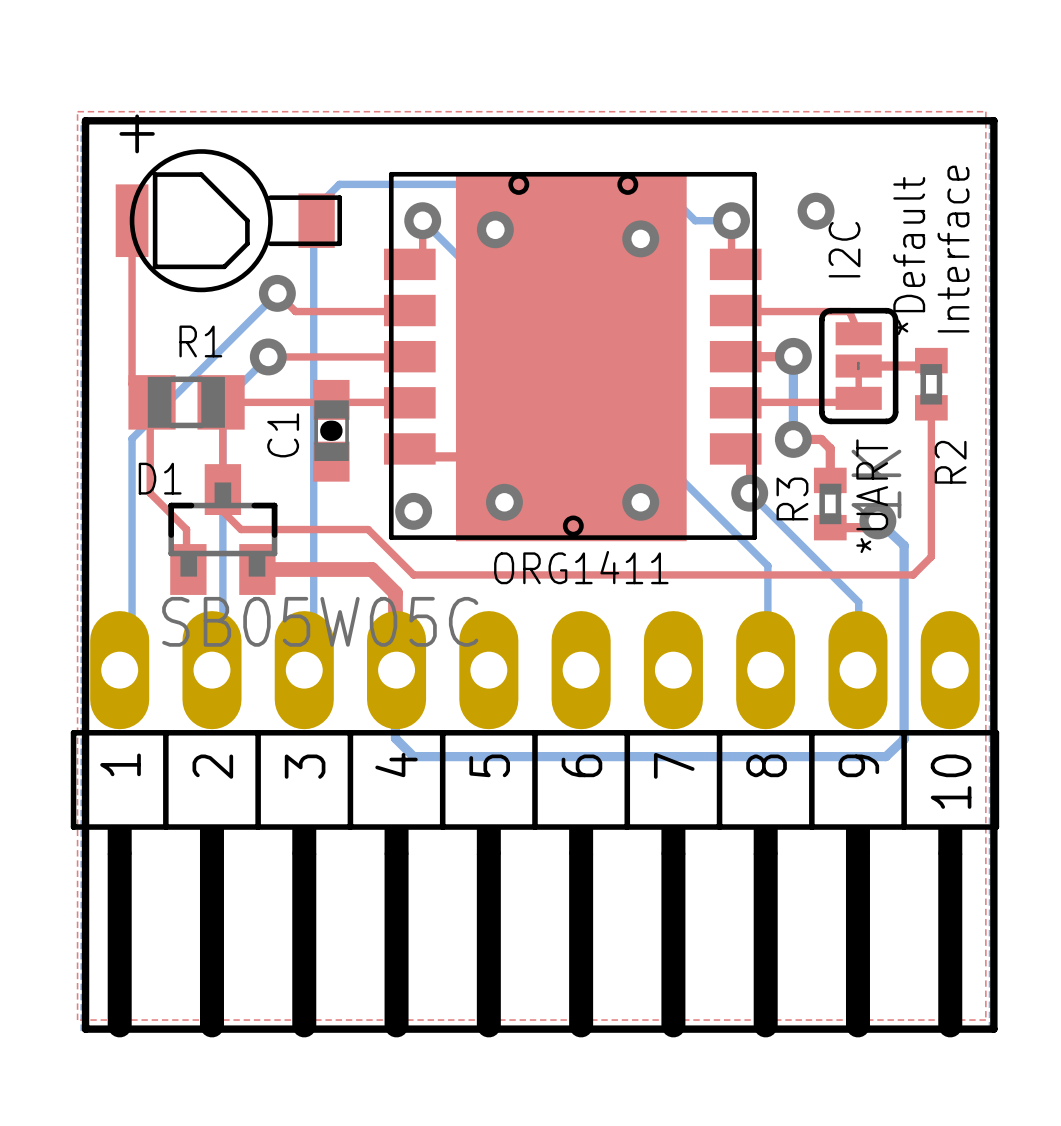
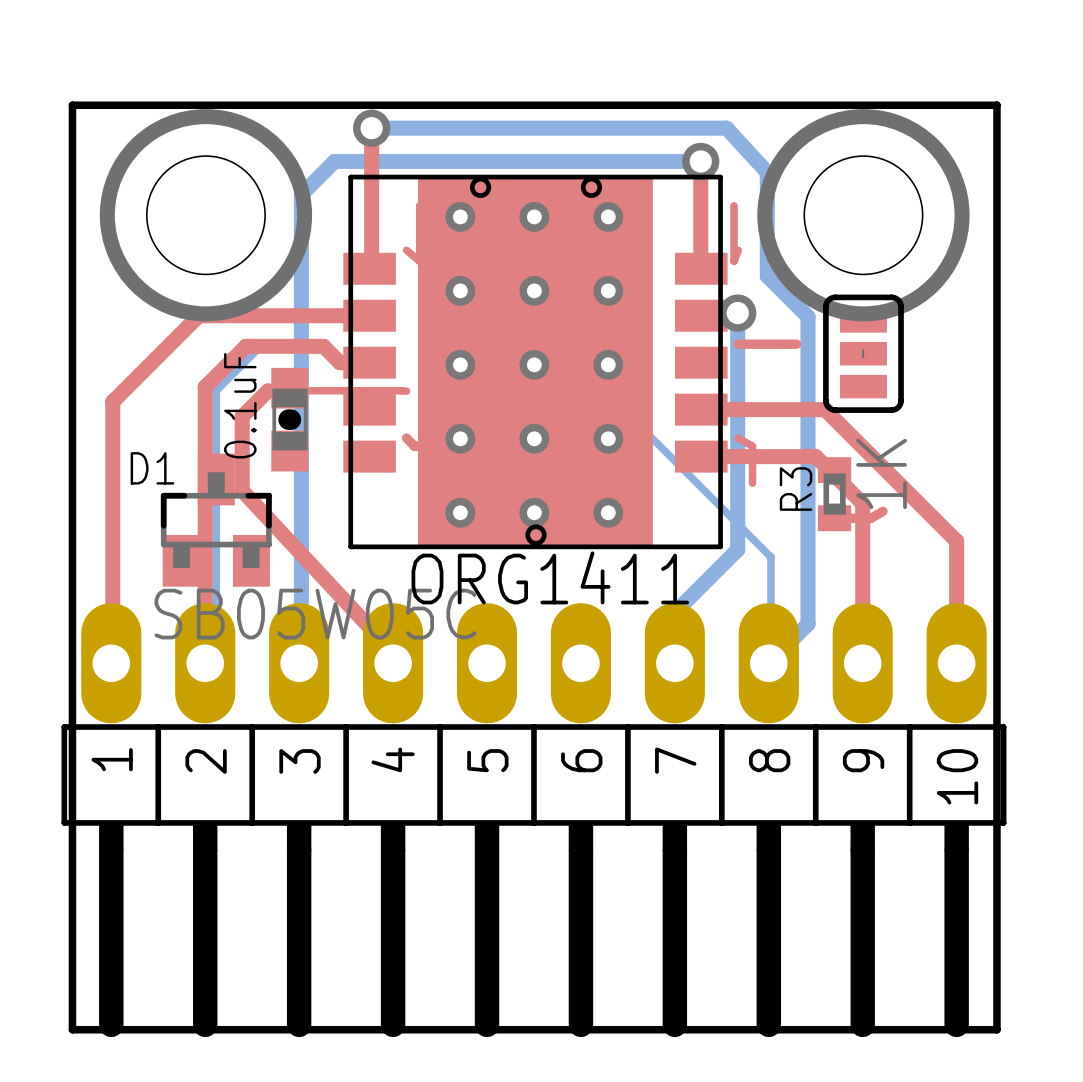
top zone outline: (77, 111) (77, 1020) (985, 1020) (985, 111) (77, 111) -> none
drawing: [81, 117, 998, 1033] -> none
top track: none -> (371, 128) (371, 268) (369, 268)
bottom track: none -> (371, 128) (726, 128) (767, 172) (767, 276) (807, 316) (807, 624) (768, 663) (767, 661)
via: none -> (371, 128)
top track: none -> (700, 161) (700, 268)
via: none -> (700, 161)
via: (816, 211) -> none
top track: (132, 220) (132, 384) (150, 384) -> none
part: (228, 220) -> none
via: (422, 220) -> none
bottom track: (731, 220) (695, 220) (658, 184) (339, 184) (313, 210) (313, 656) (304, 670) -> (700, 161) (334, 161) (301, 194) (301, 661) (299, 663)
via: (731, 220) -> none
via position: (495, 229) -> (460, 216)
via: none -> (534, 216)
via position: (640, 238) -> (608, 216)
text: I2C (844, 249) -> none
text: Interface (953, 249) -> none
text: *Default (909, 256) -> none
top track: (277, 293) (295, 311) (409, 310) -> none
bottom track: (277, 293) (132, 438) (132, 656) (119, 670) -> none
via: (277, 293) -> none
via: none -> (460, 290)
via: none -> (534, 290)
via: none -> (608, 290)
top track: (735, 310) (731, 311) (849, 311) (858, 333) -> none
bottom track: none -> (737, 313) (737, 549) (674, 612) (674, 663)
via: none -> (737, 313)
top track: none -> (369, 315) (198, 315) (112, 401) (111, 663)
via: (268, 356) -> none
top track: (409, 356) (268, 356) -> none
part: ORG1411 (572, 356) -> none
bottom track: (793, 356) (793, 439) -> none
via: (793, 356) -> none
top track: (925, 366) (858, 366) (858, 398) (850, 402) (735, 402) -> none
top track: none -> (369, 362) (339, 362) (323, 346) (245, 346) (205, 387) (205, 663)
part: none -> ORG1411 (535, 361)
via: none -> (460, 364)
via: none -> (534, 364)
via: none -> (608, 364)
top track: (150, 384) (150, 493) (186, 529) (186, 565) (188, 569) -> none
R2: (931, 384) -> none
R1: (186, 402) -> none
top track: (221, 402) (273, 402) -> none
top track: (222, 402) (222, 511) (241, 529) (368, 529) (413, 574) (913, 574) (931, 556) (931, 402) -> none
C1 value: none -> 0.1uF (240, 405)
top track: none -> (701, 409) (825, 409) (956, 541) (956, 663)
C1 position: (331, 430) -> (289, 419)
C1 name: C1 (283, 435) -> none
top track: (793, 439) (821, 439) (830, 448) (830, 480) -> none
via: (793, 439) -> none
via: none -> (460, 438)
via: none -> (534, 438)
via: none -> (608, 438)
top track: none -> (701, 456) (815, 456) (862, 503) (862, 663)
bottom track: (749, 493) (858, 602) (857, 670) -> none
via: (749, 493) -> none
text: *UART (872, 496) -> none
via: (504, 502) -> none
via: (640, 502) -> none
via: (413, 511) -> none
bottom track: (877, 520) (904, 545) (904, 739) (885, 756) (413, 756) (395, 738) (396, 670) -> none
via: (877, 520) -> none
via: none -> (460, 512)
via: none -> (534, 512)
via: none -> (608, 512)
top track: (257, 569) (371, 569) (395, 593) (396, 670) -> (268, 390) (242, 416) (242, 490) (393, 652) (393, 663)
part: none -> (534, 567)

